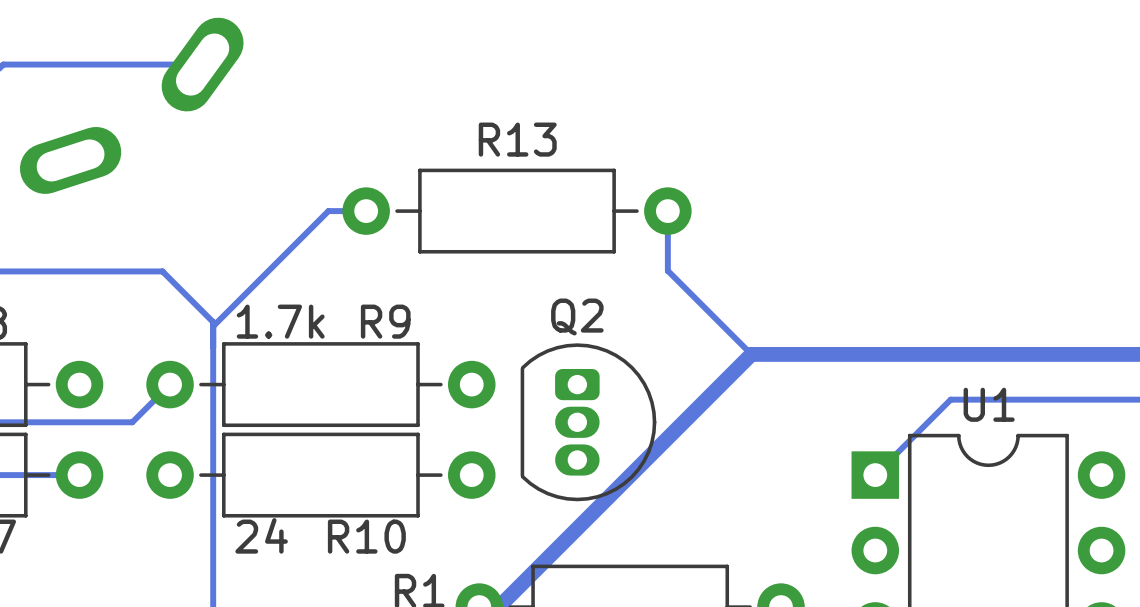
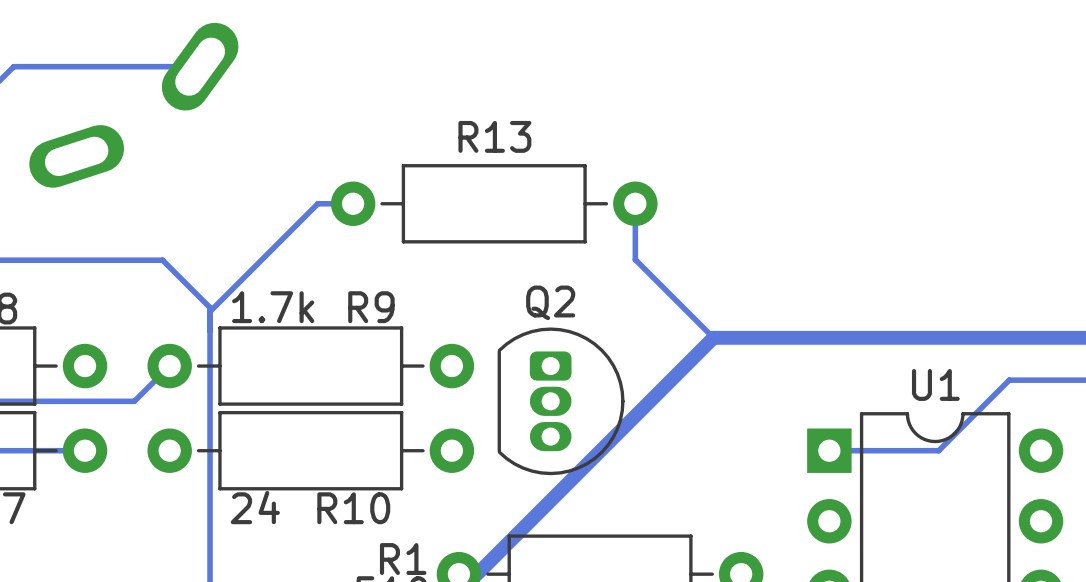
track: (1067, 399) (950, 399) (875, 475) -> (1009, 380) (938, 450) (829, 450)

